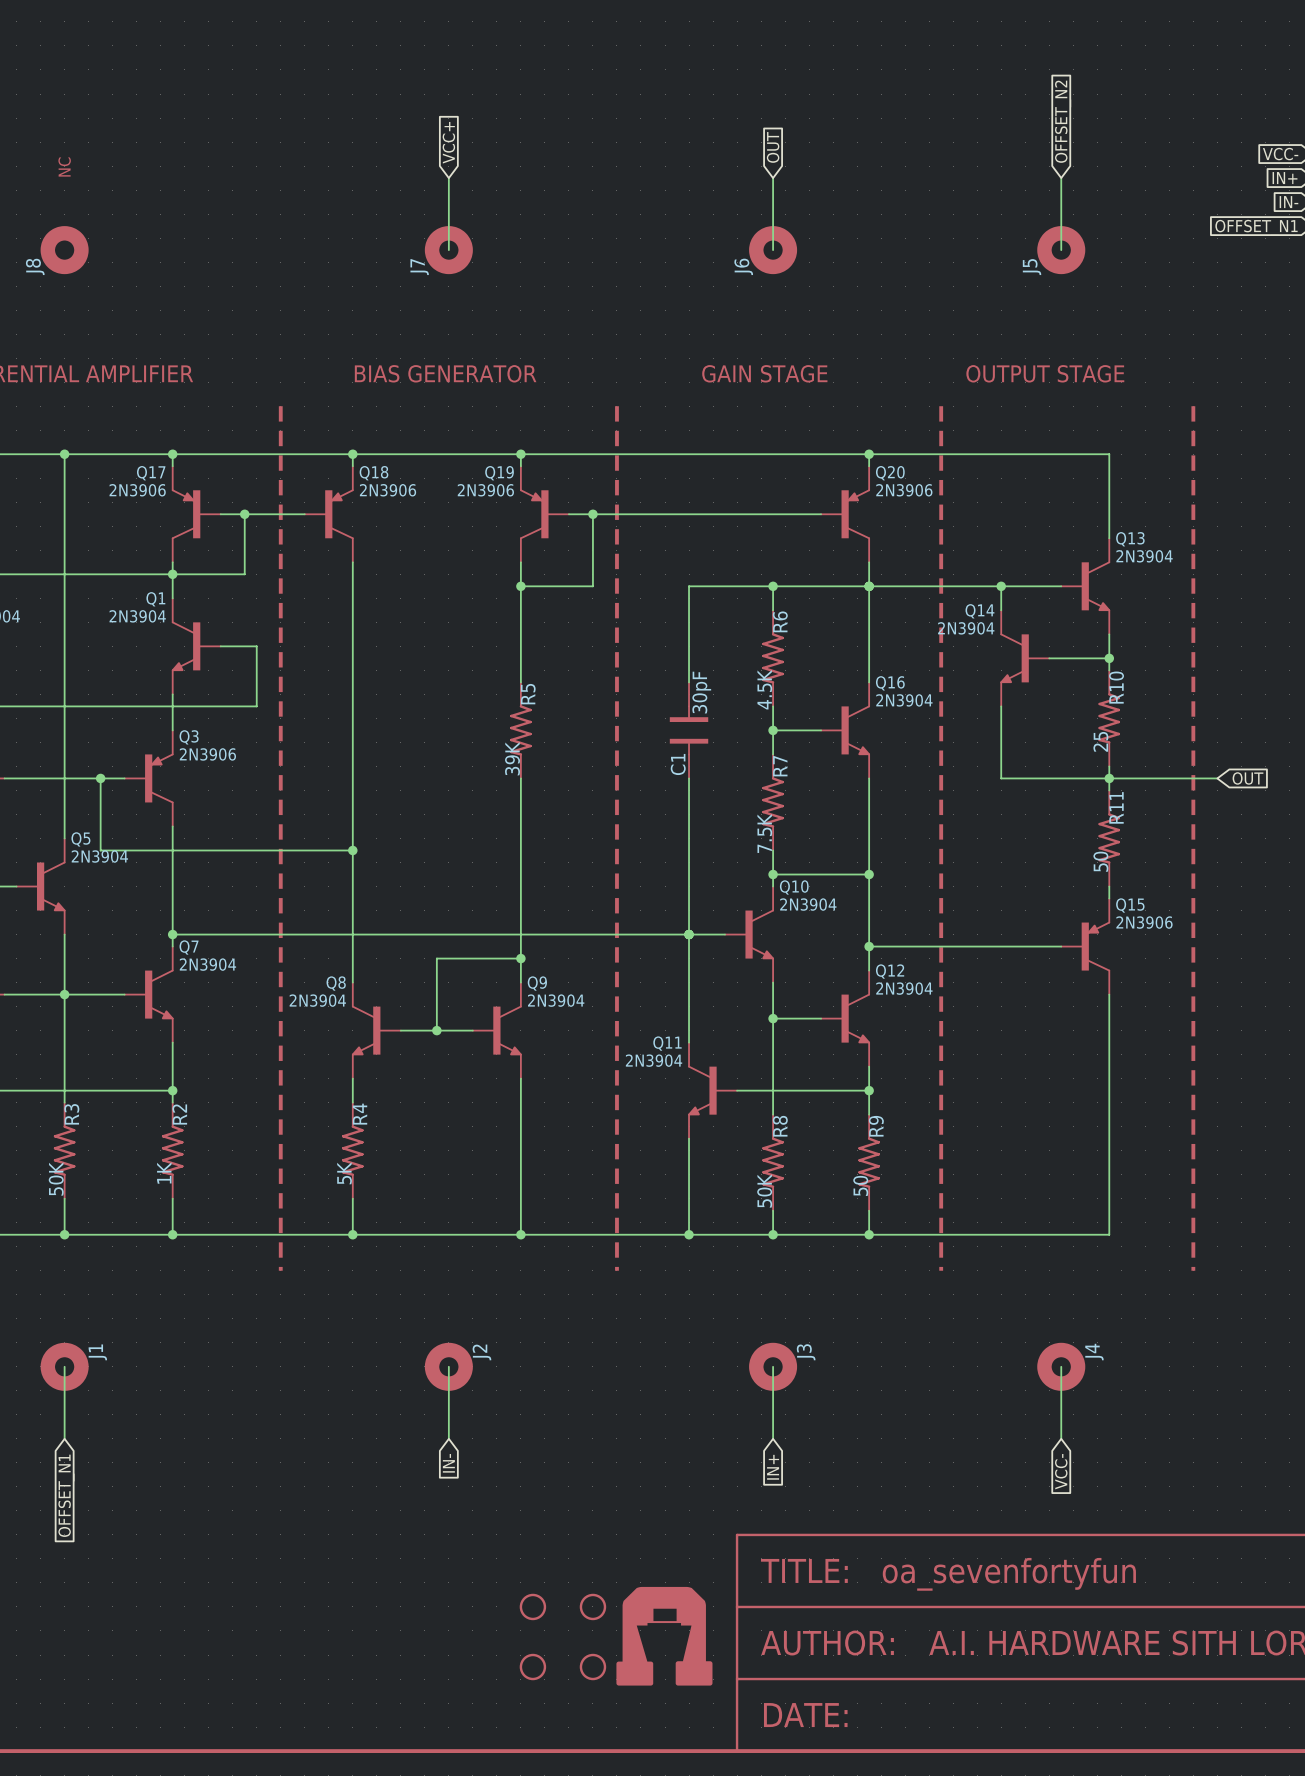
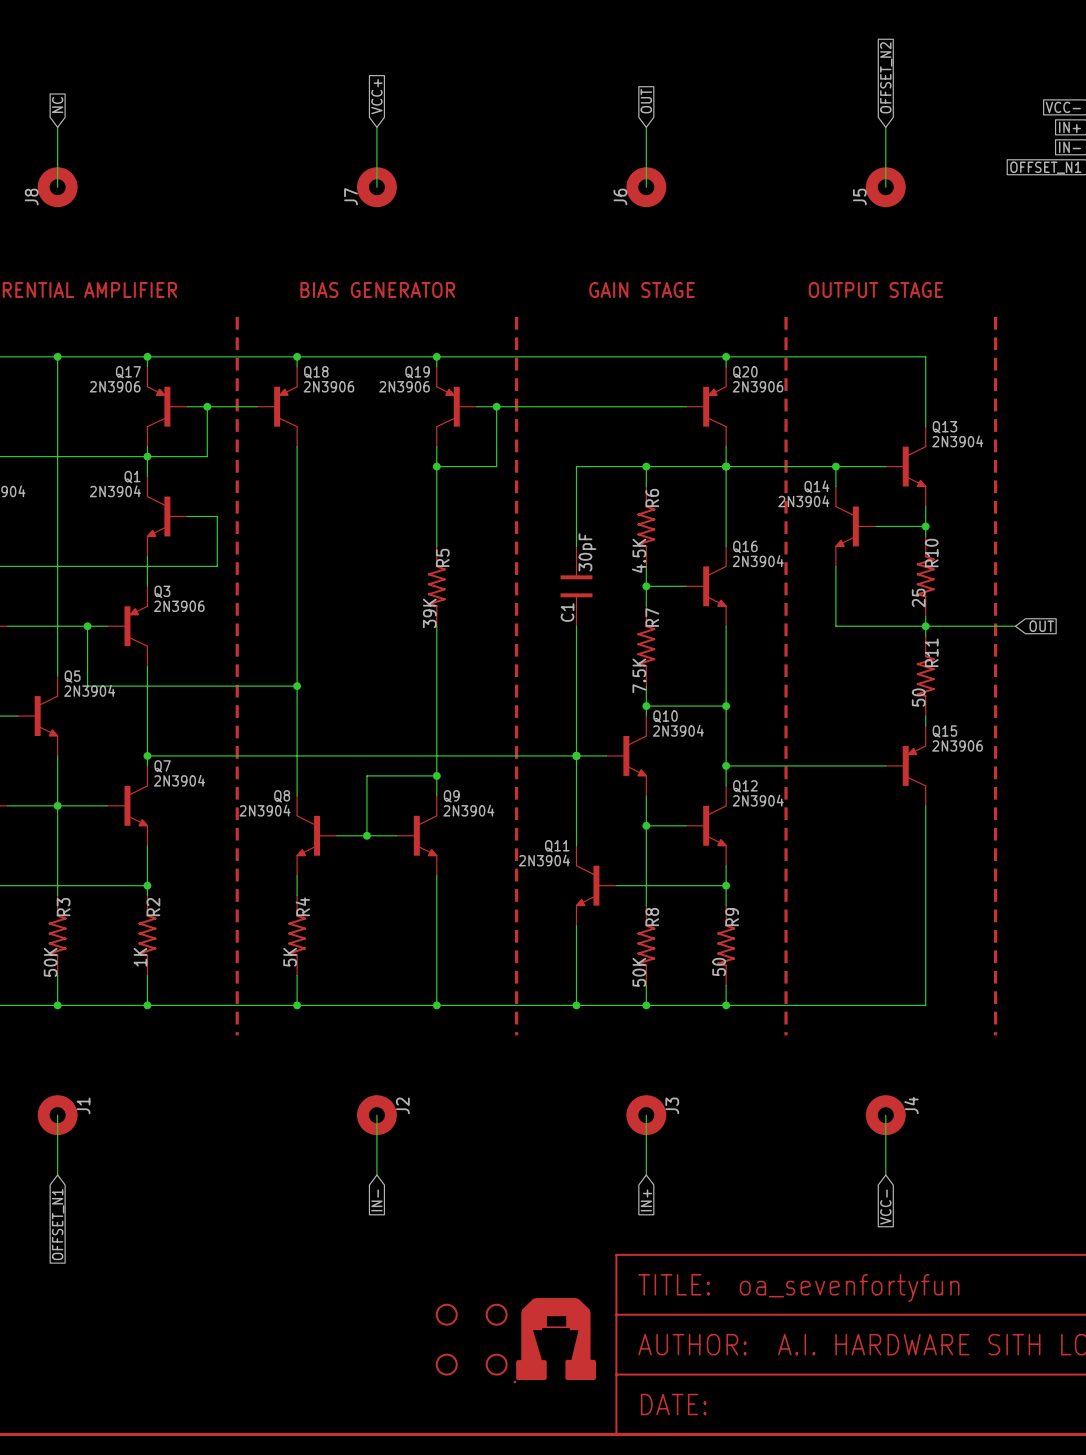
global label: none -> NC (57, 104)
text: NC (64, 167) -> none
wire: none -> (57, 127) (57, 187)

